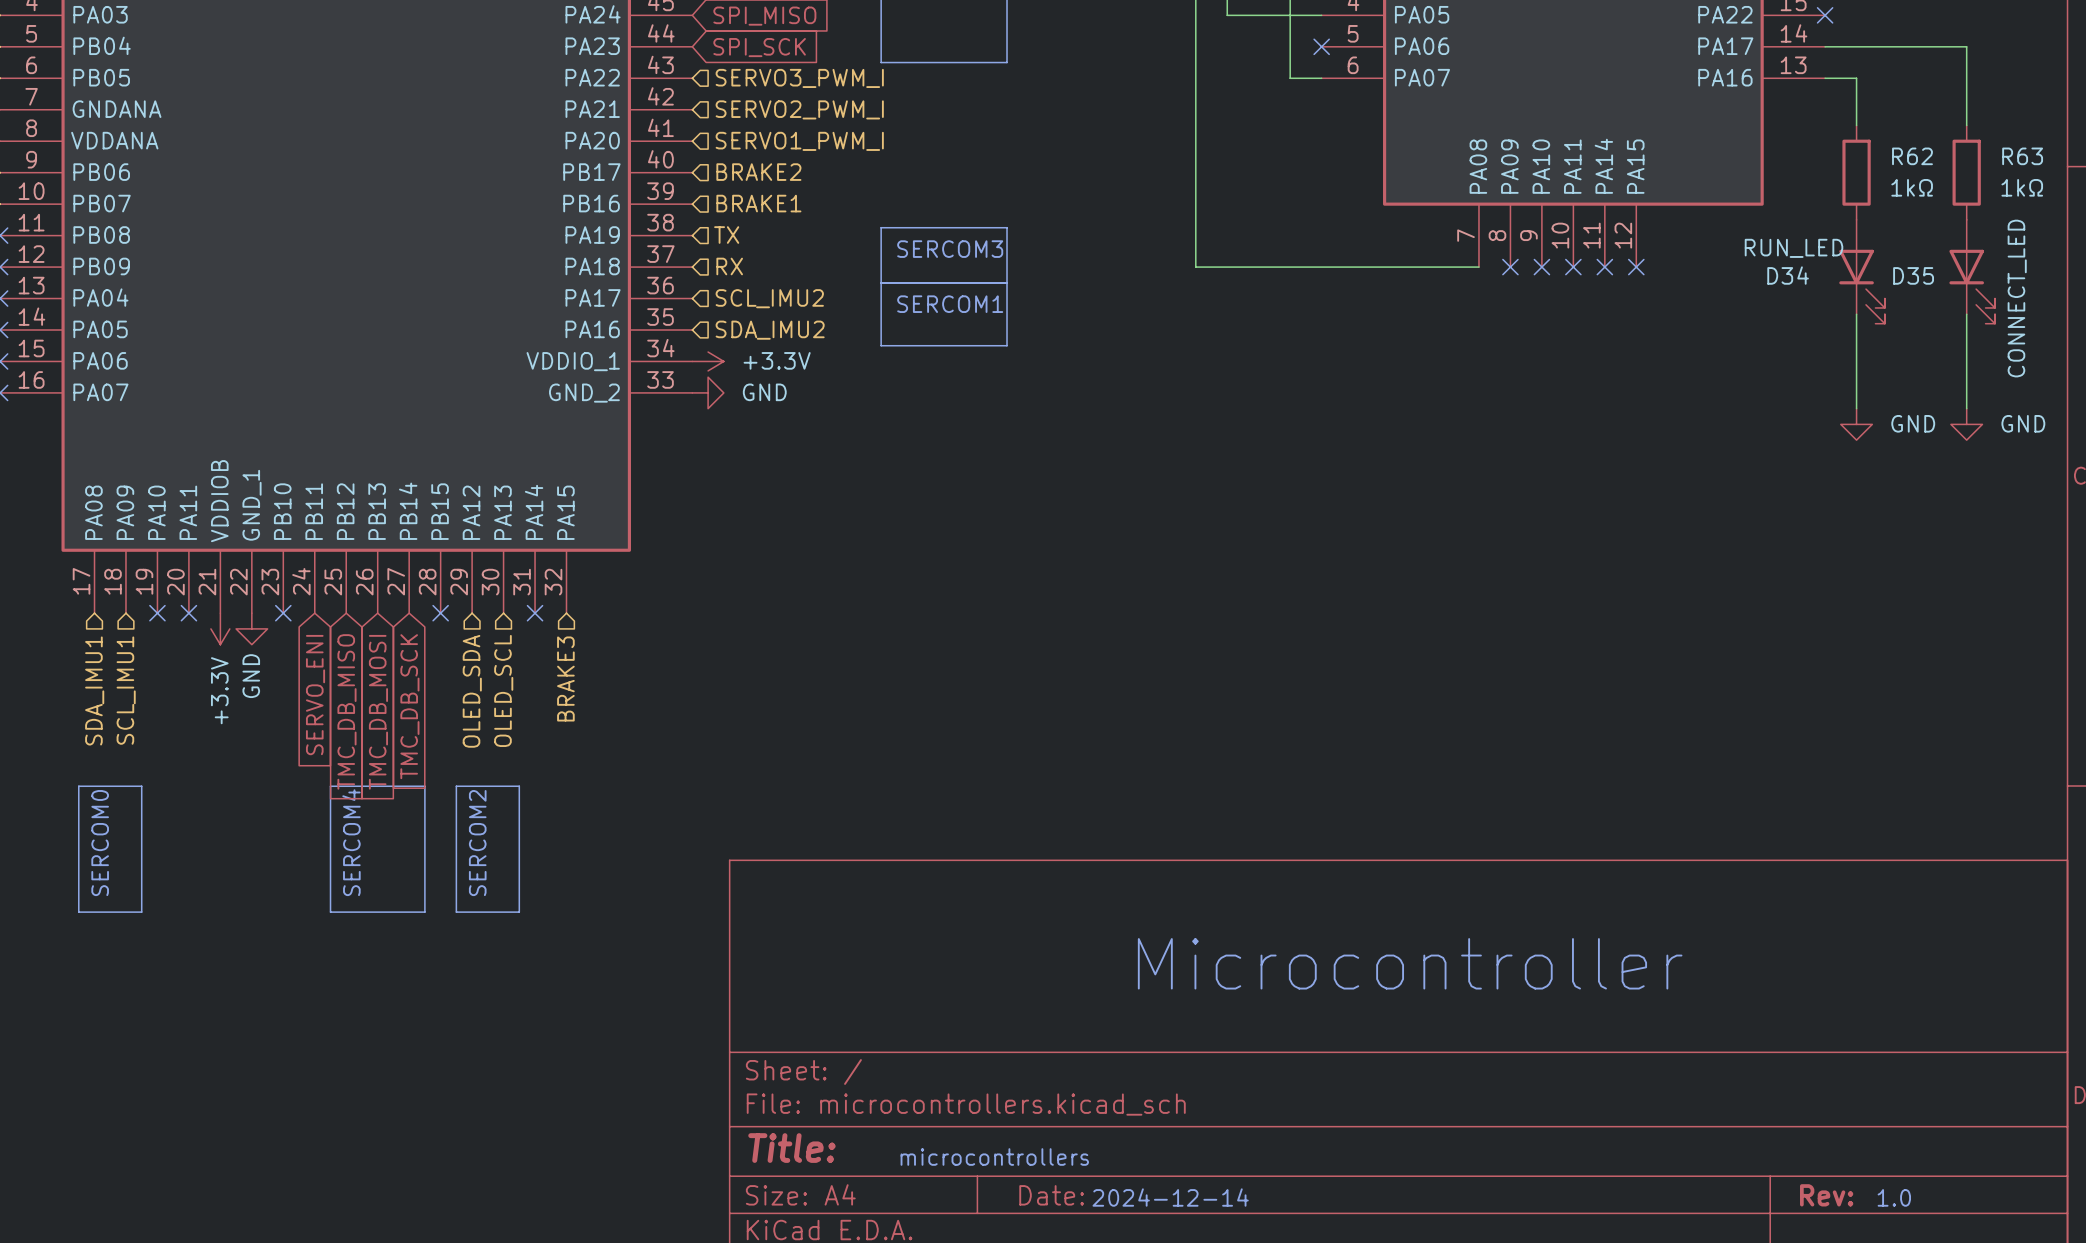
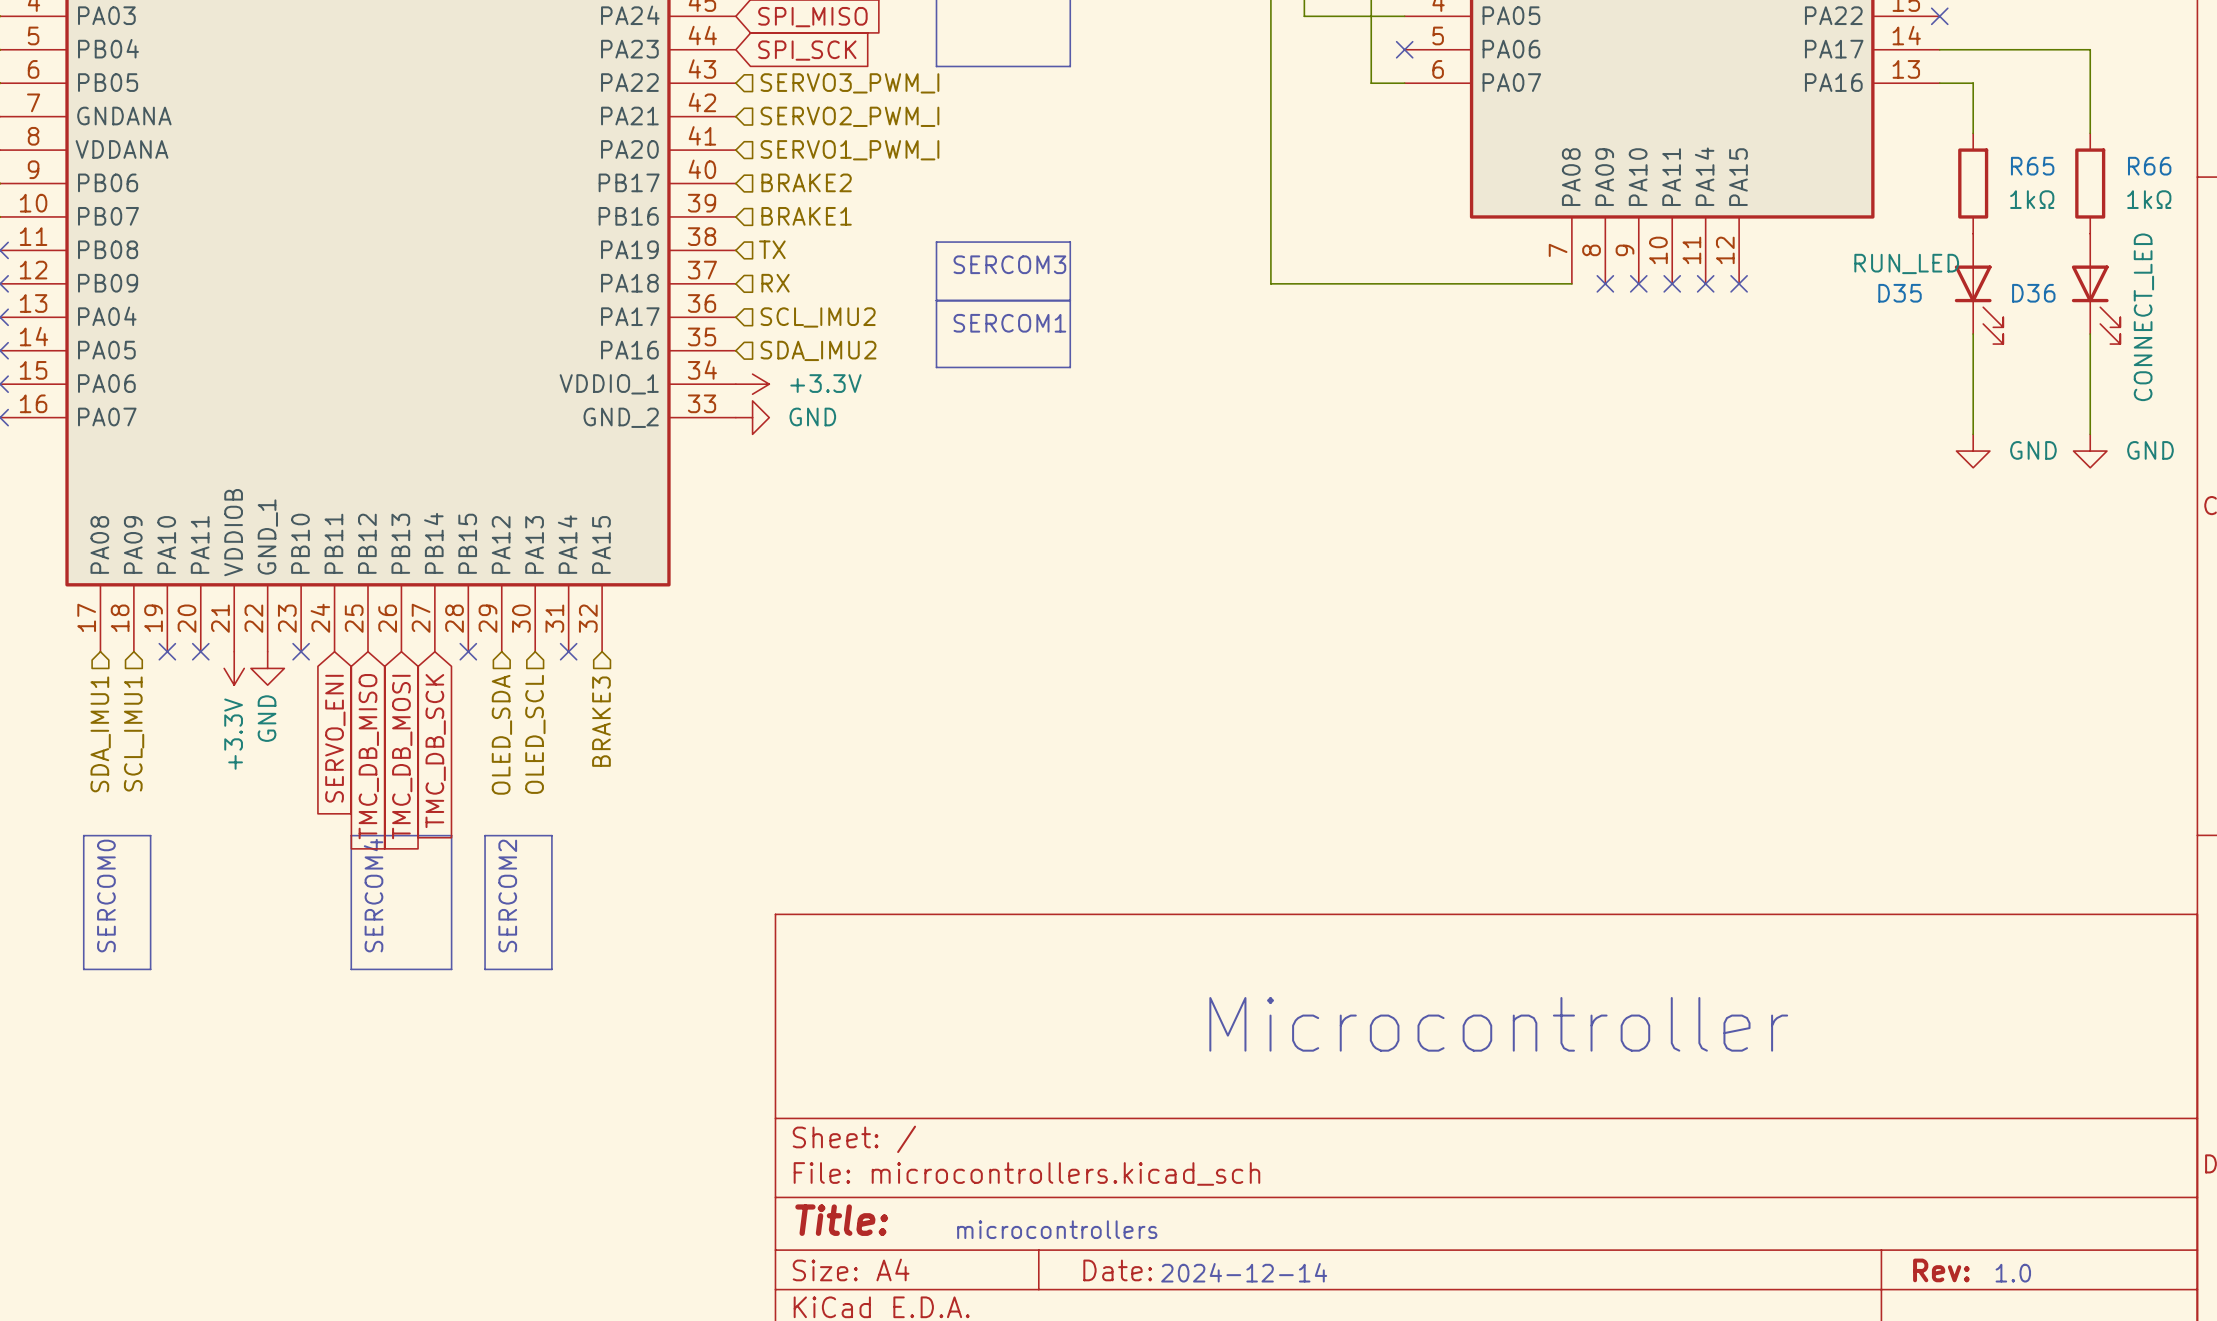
R62 name: R62 (1912, 156) -> R65 (2032, 166)
R63 name: R63 (2022, 156) -> R66 (2149, 166)
D34 name: D34 (1788, 275) -> D35 (1900, 293)
D35 name: D35 (1913, 275) -> D36 (2033, 293)

